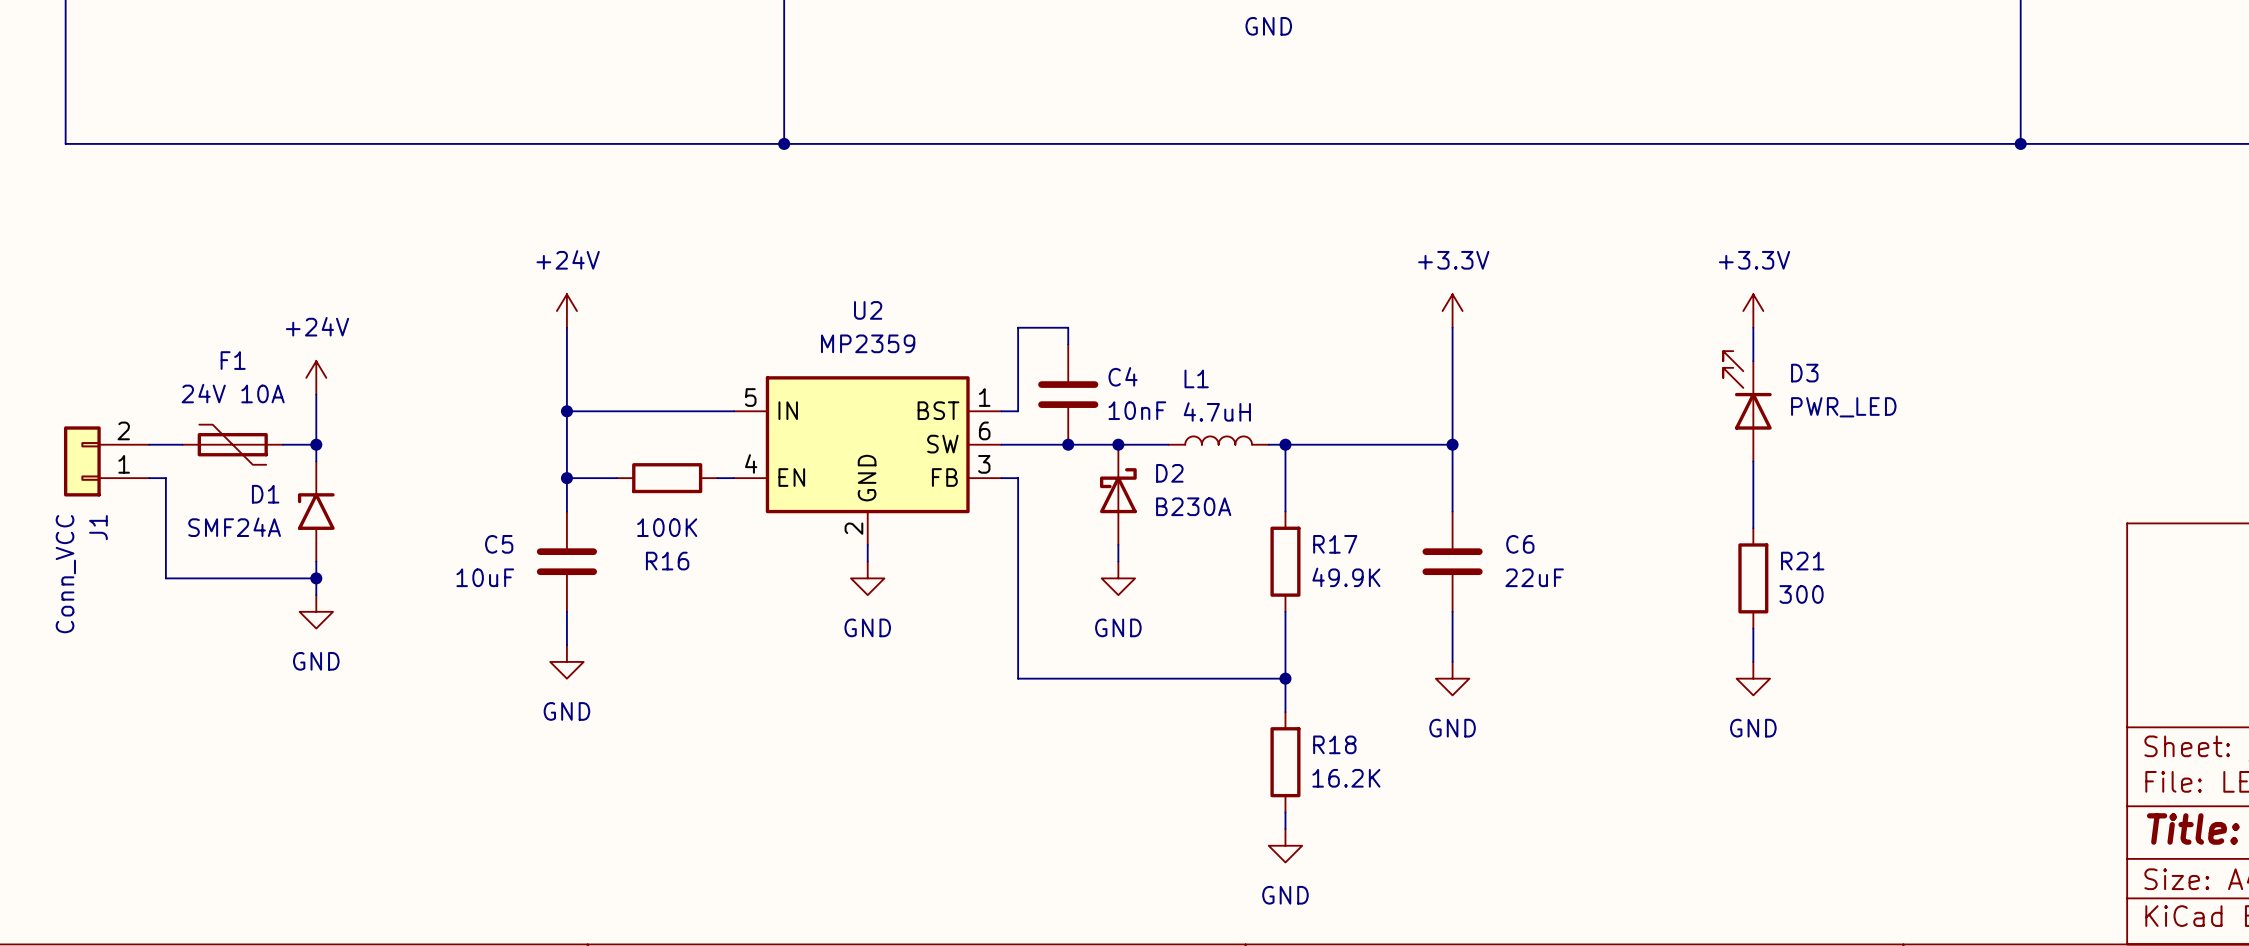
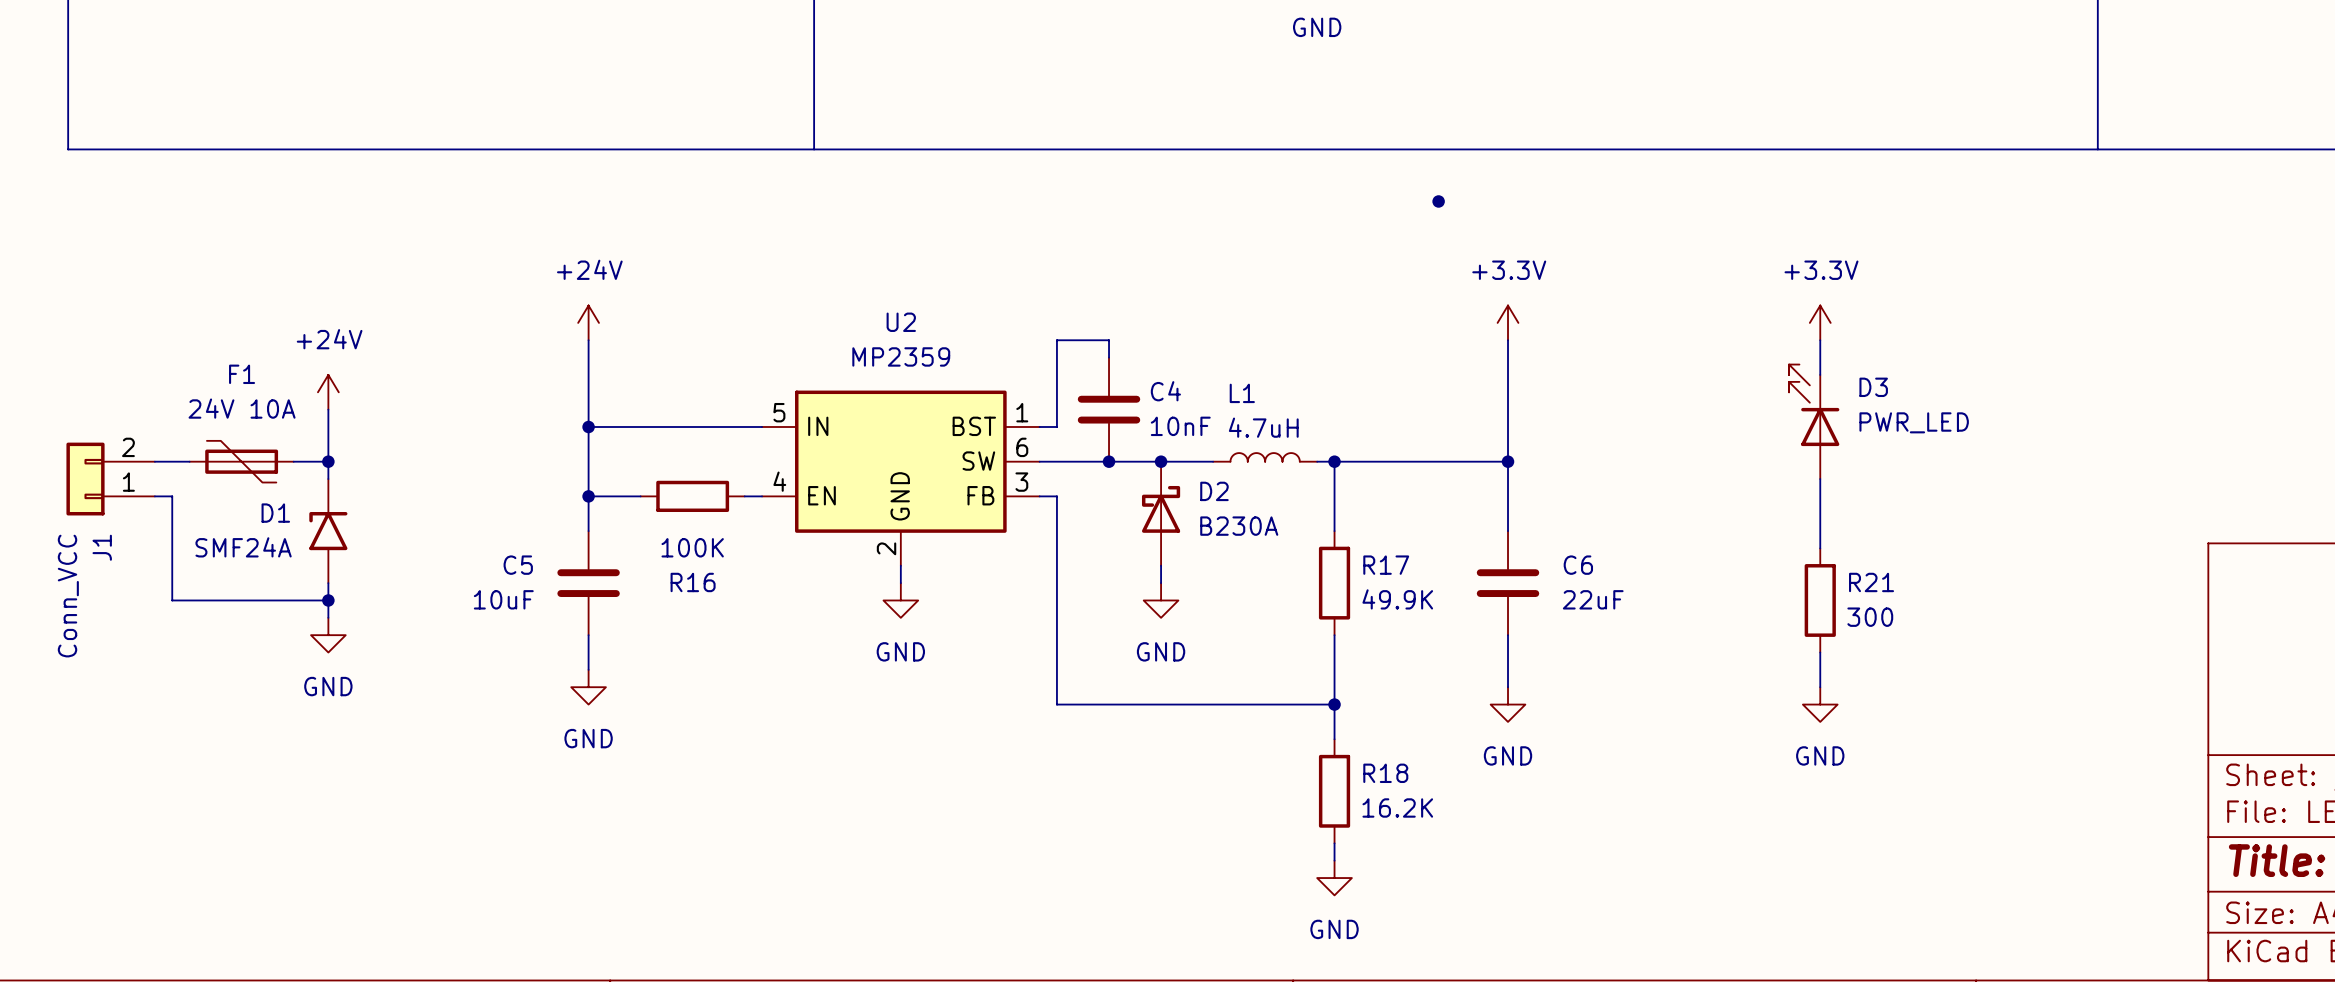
junction: (784, 143) -> none
junction: (2020, 143) -> none
junction: none -> (1438, 201)

